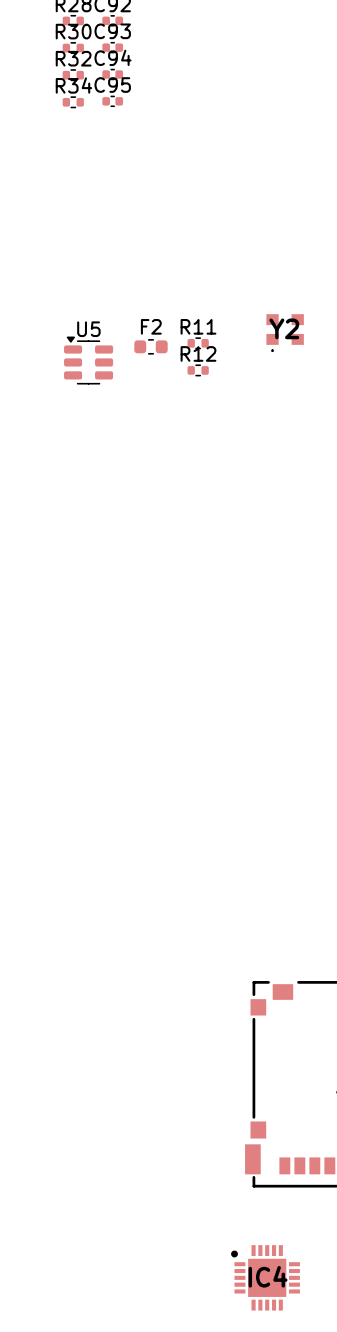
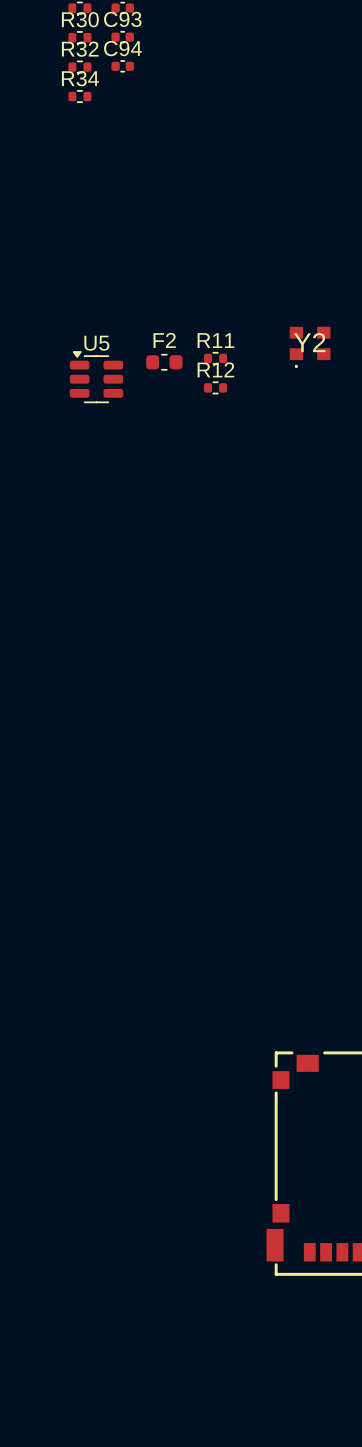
C95: (112, 101) -> none
IC4: (265, 1277) -> none

